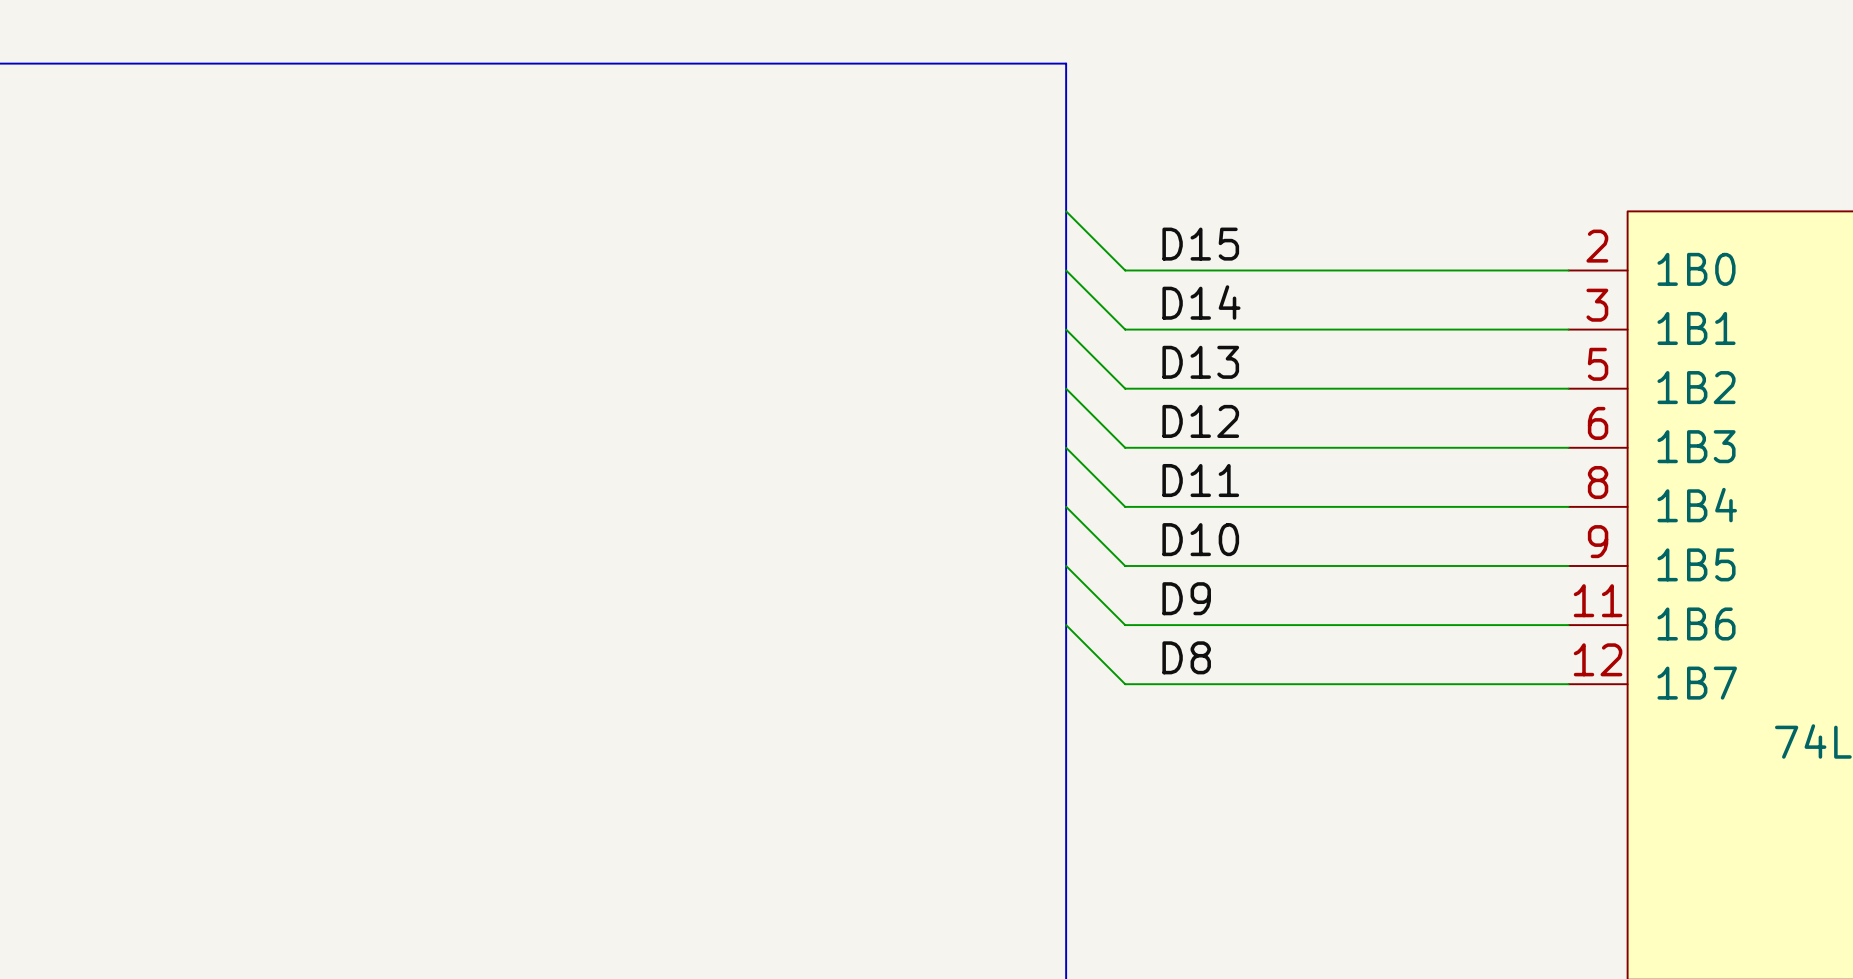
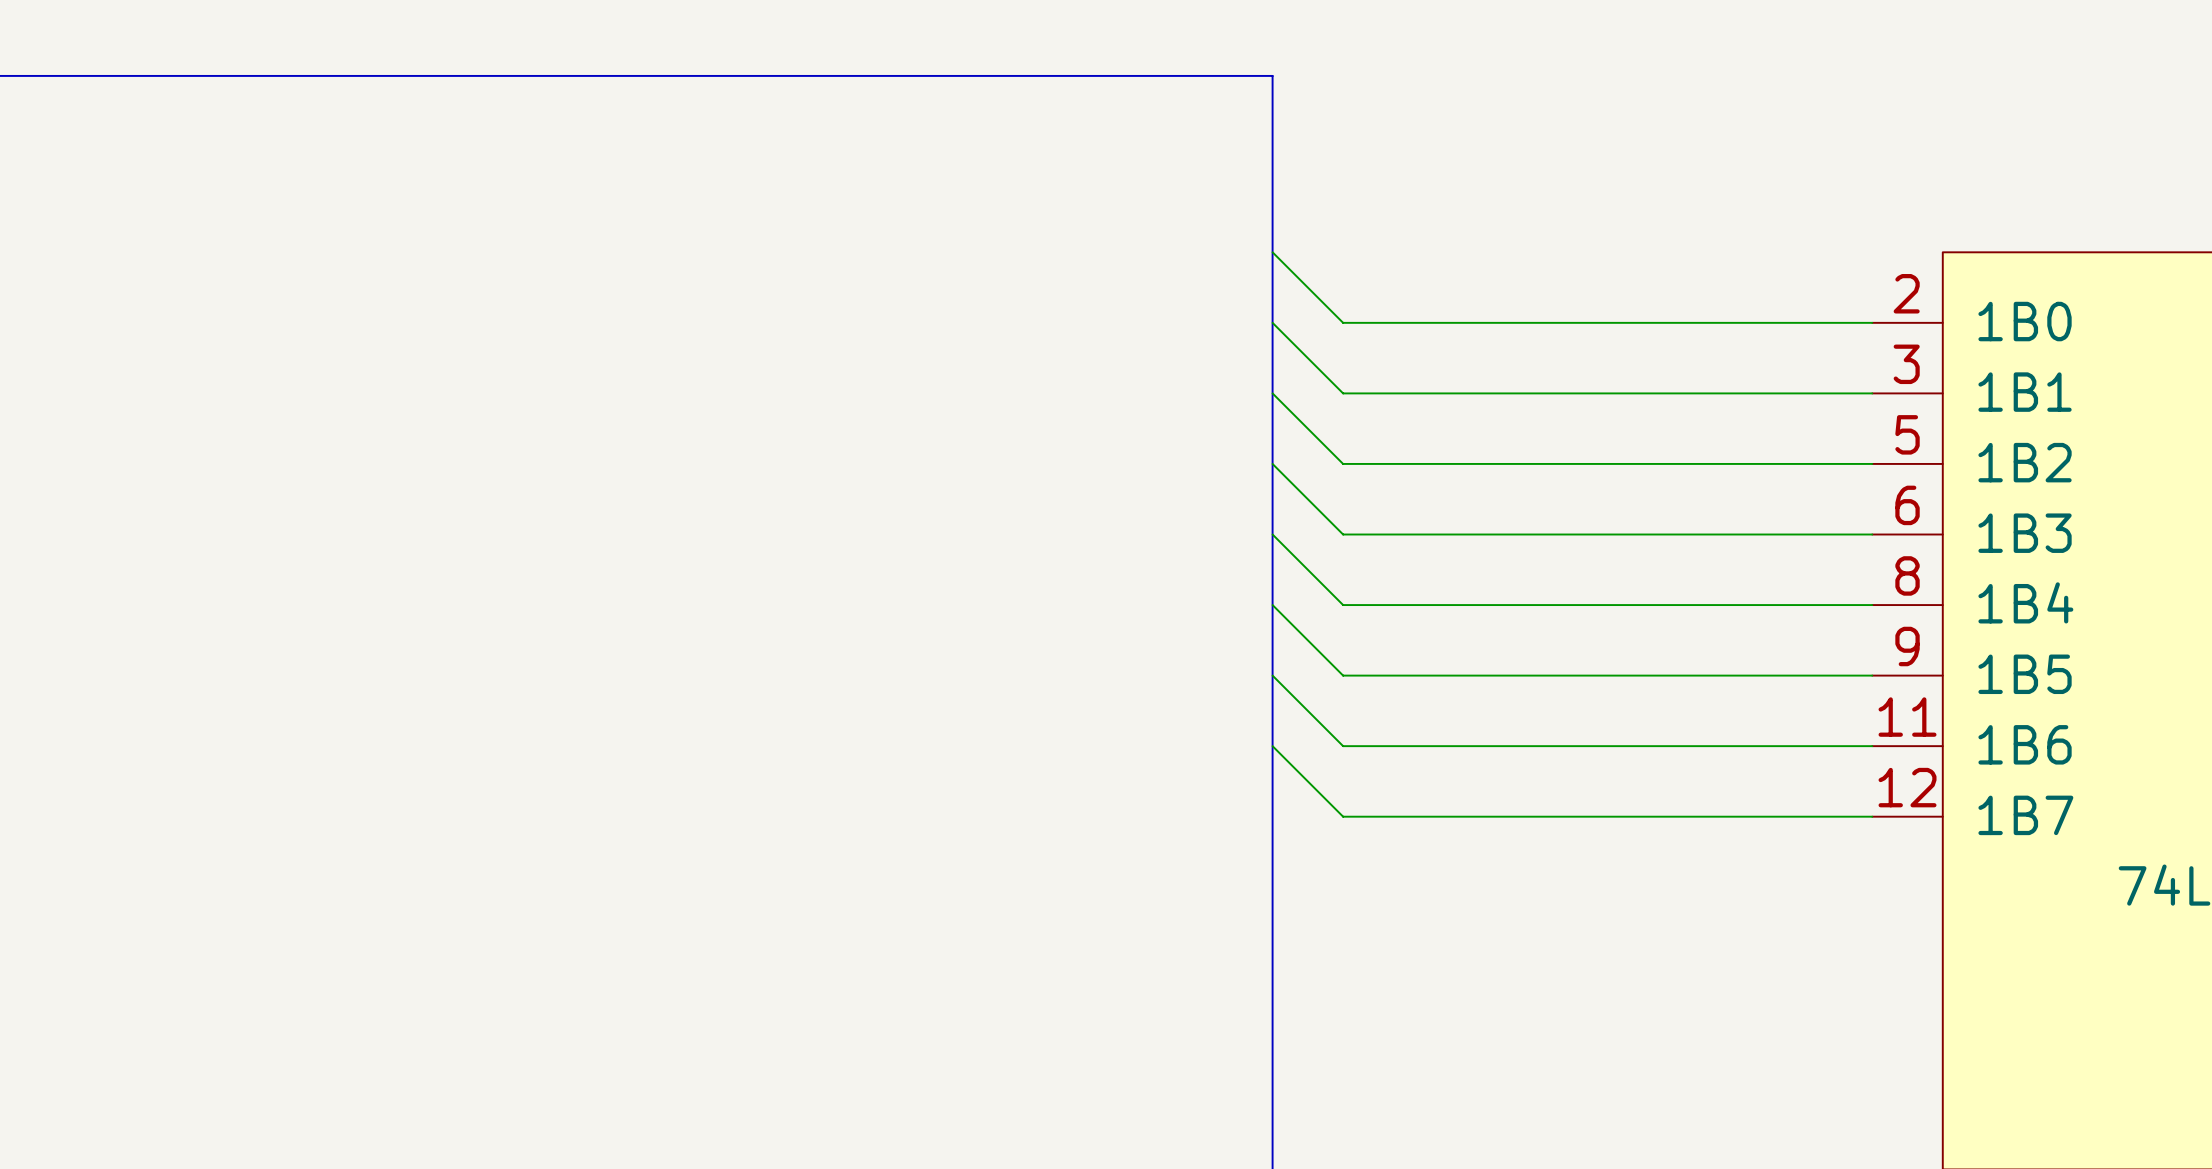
label: D15 (1200, 244) -> none
label: D14 (1201, 302) -> none
label: D13 (1200, 362) -> none
label: D12 (1200, 421) -> none
label: D11 (1200, 480) -> none
label: D10 (1200, 539) -> none
label: D9 (1186, 598) -> none
label: D8 (1186, 657) -> none

